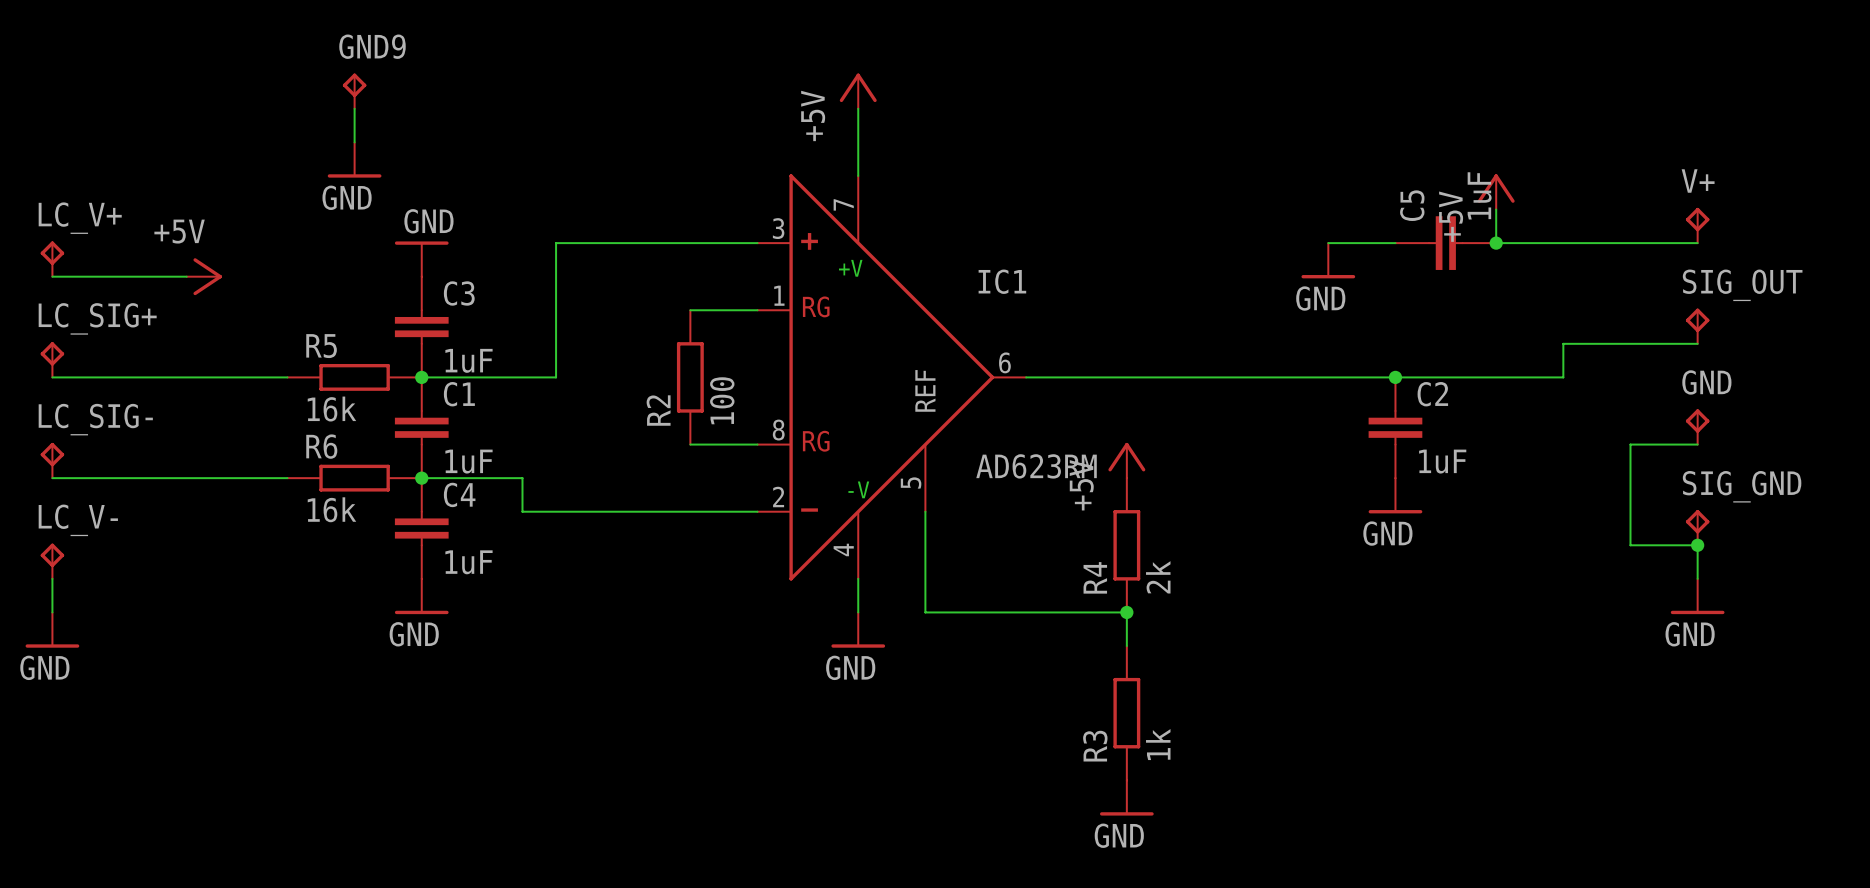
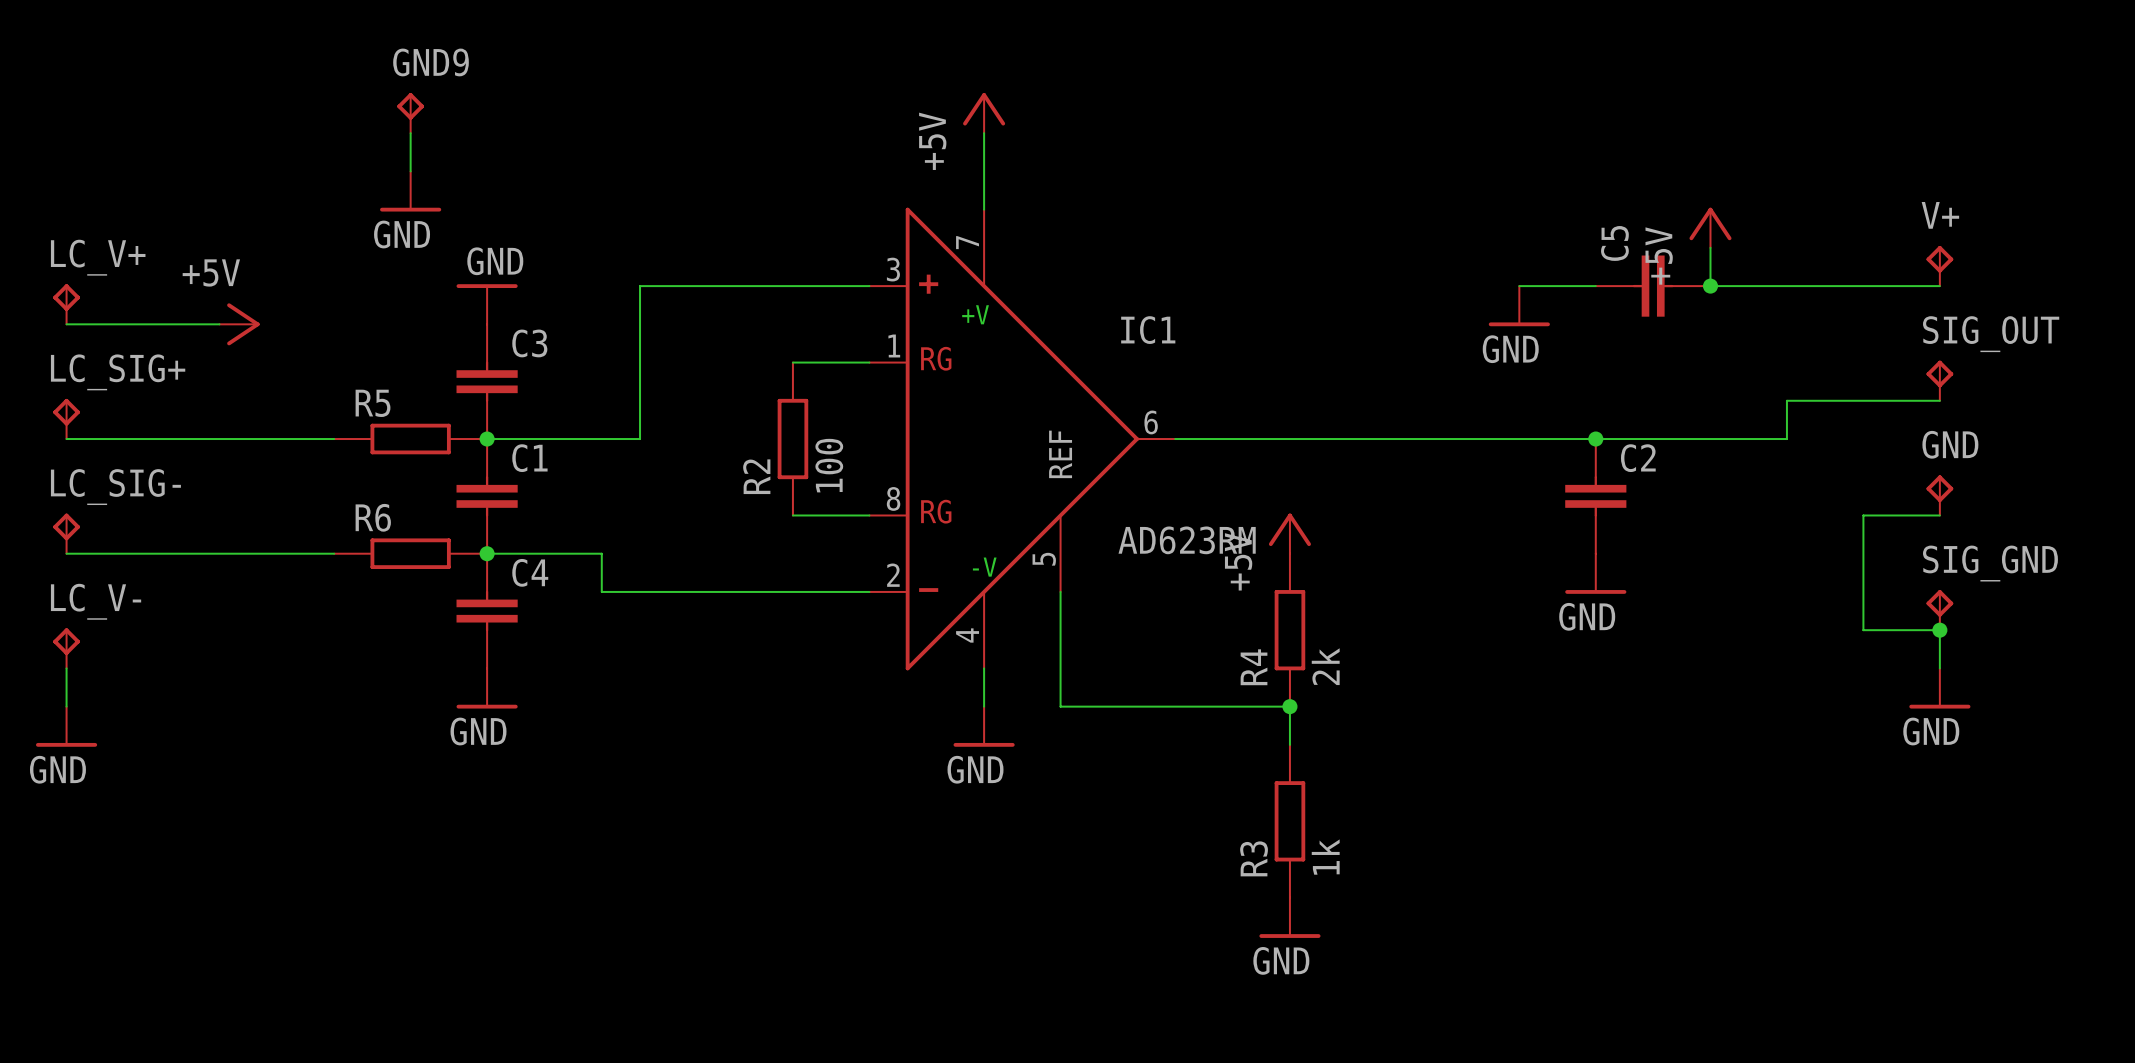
C5 value: 1uF (1479, 195) -> none
C3 value: 1uF (468, 360) -> none
R5 value: 16k (331, 409) -> none
C1 value: 1uF (468, 461) -> none
C2 value: 1uF (1442, 461) -> none
R6 value: 16k (331, 509) -> none
C4 value: 1uF (468, 562) -> none

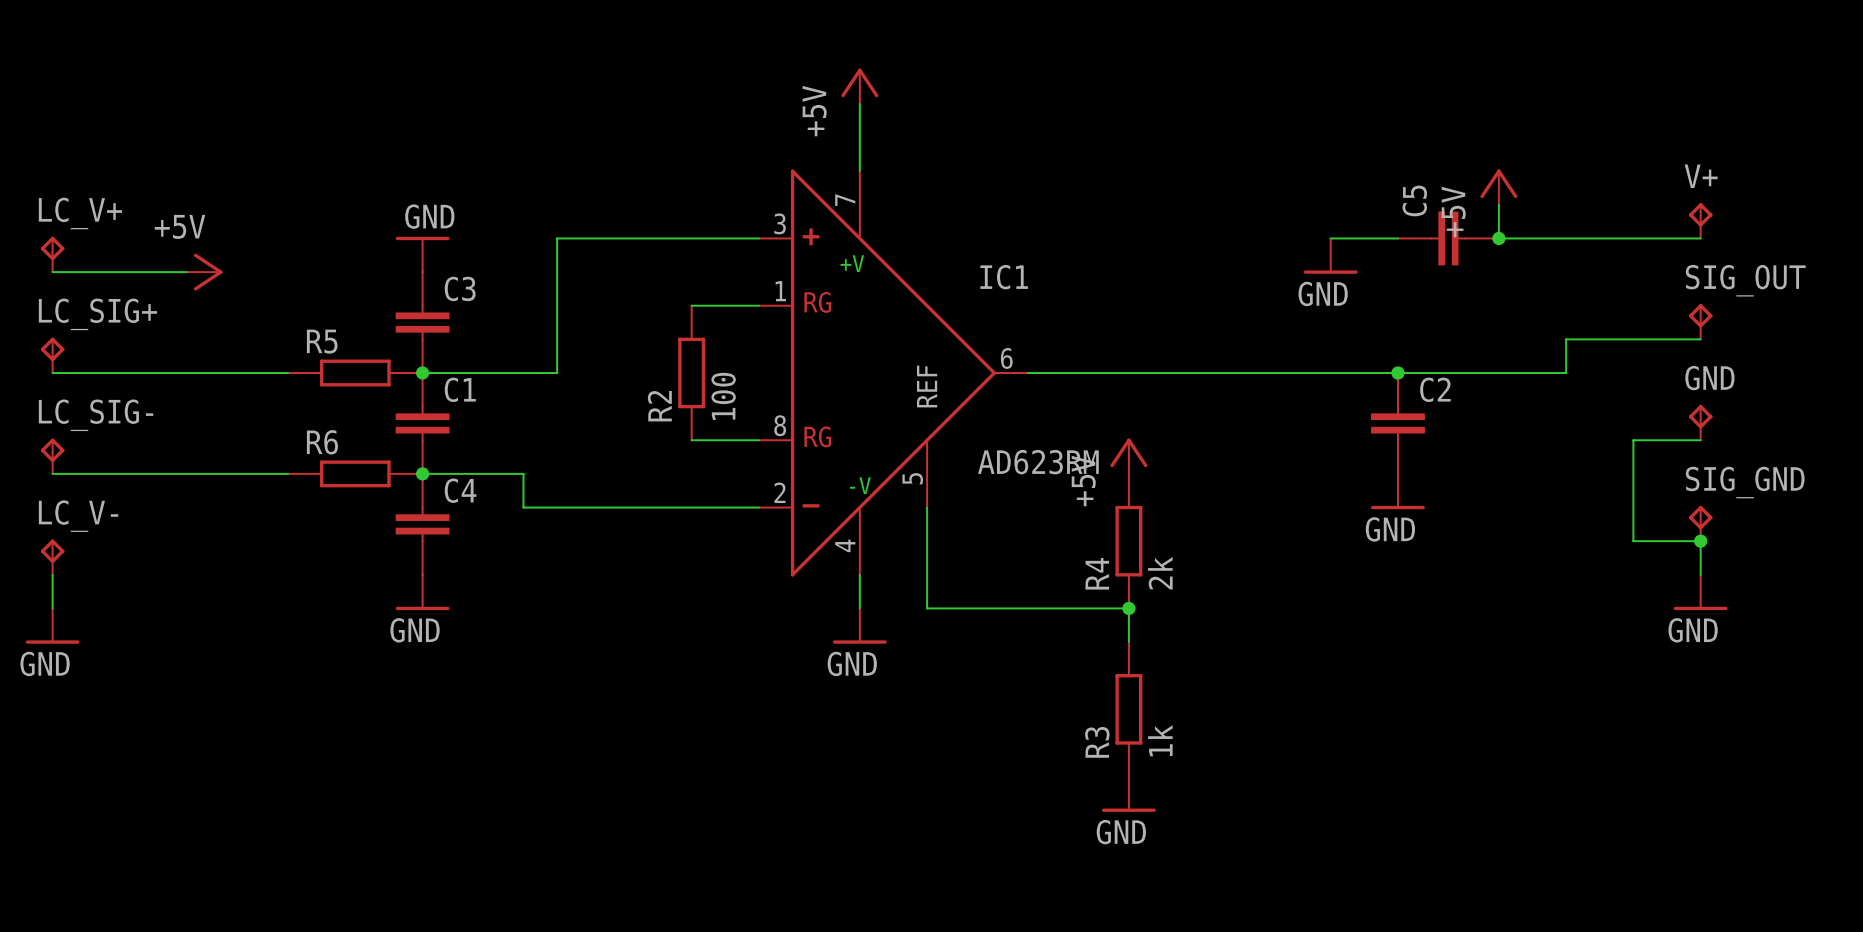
GND9: (410, 113) -> none
wire: (410, 133) (410, 171) -> none
power symbol: GND (410, 191) -> none

